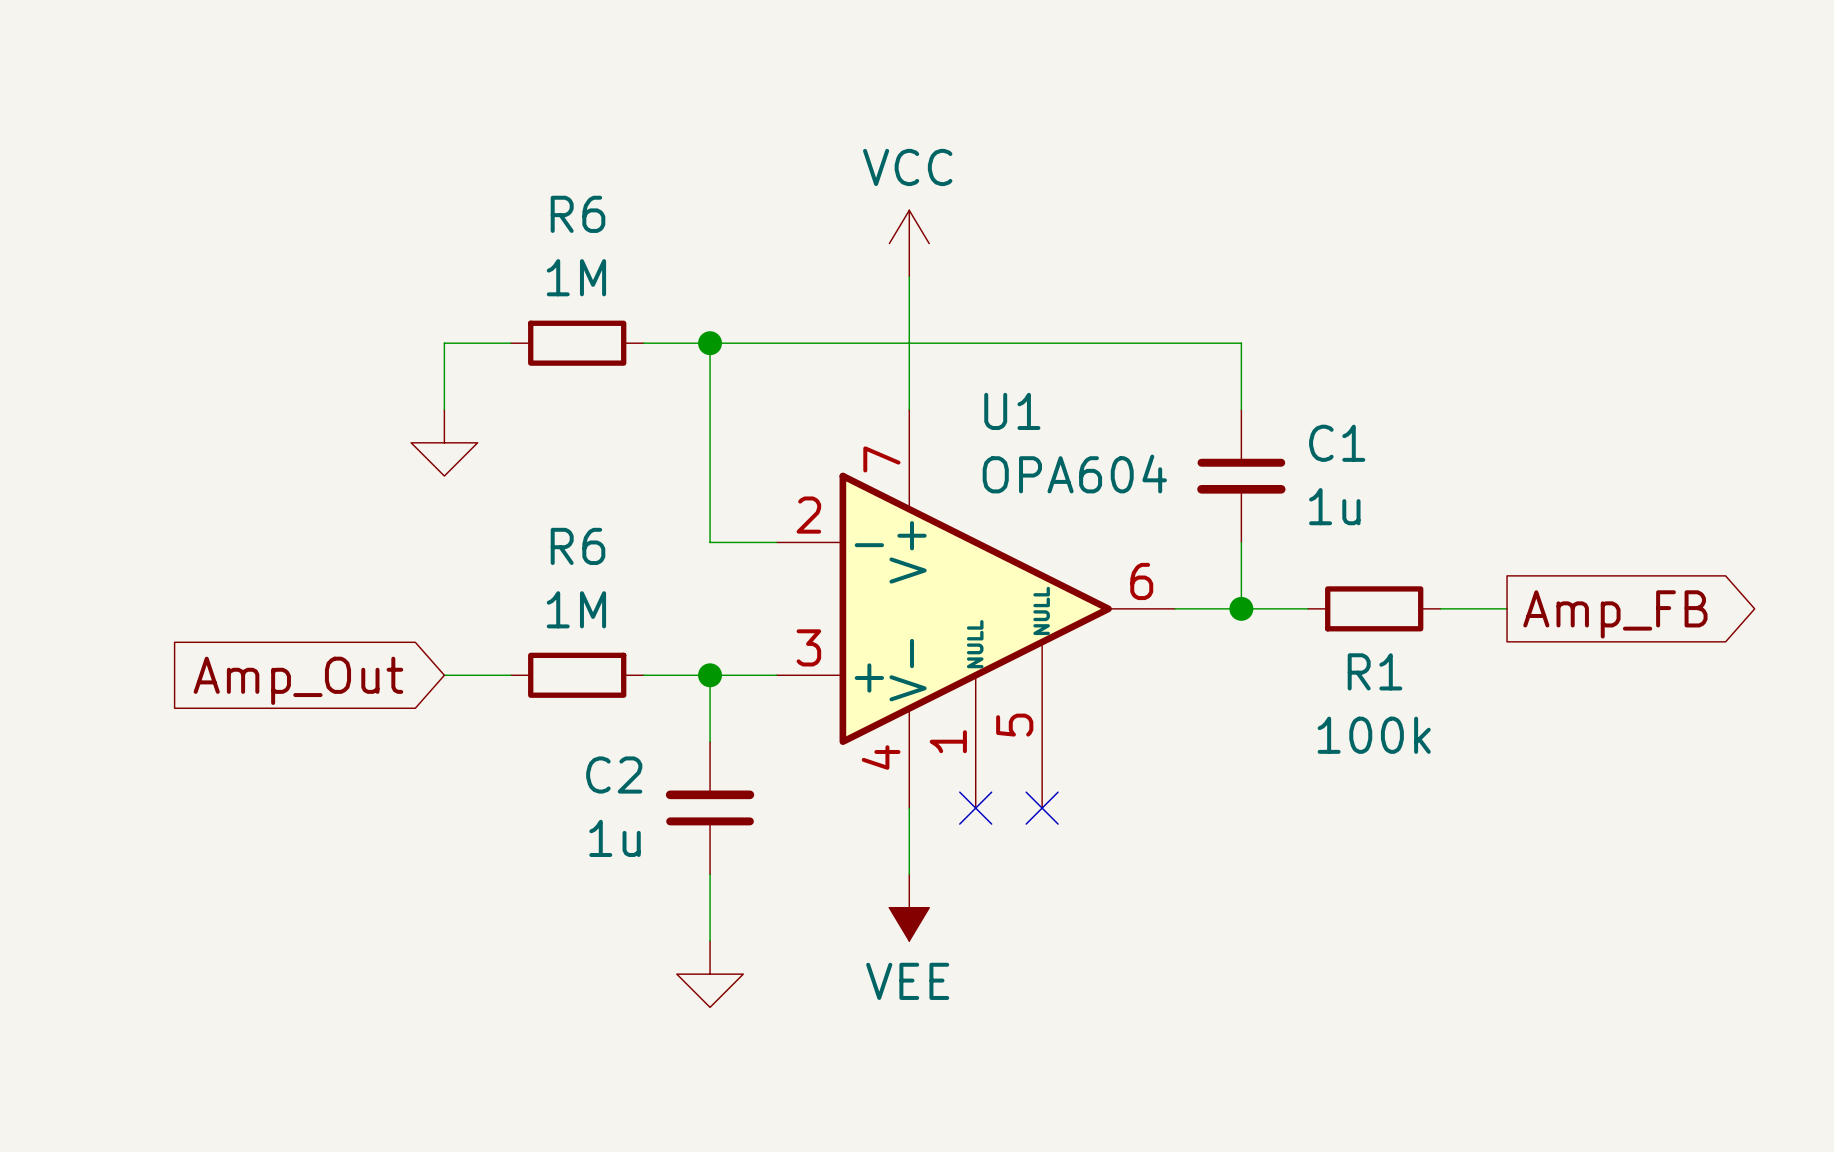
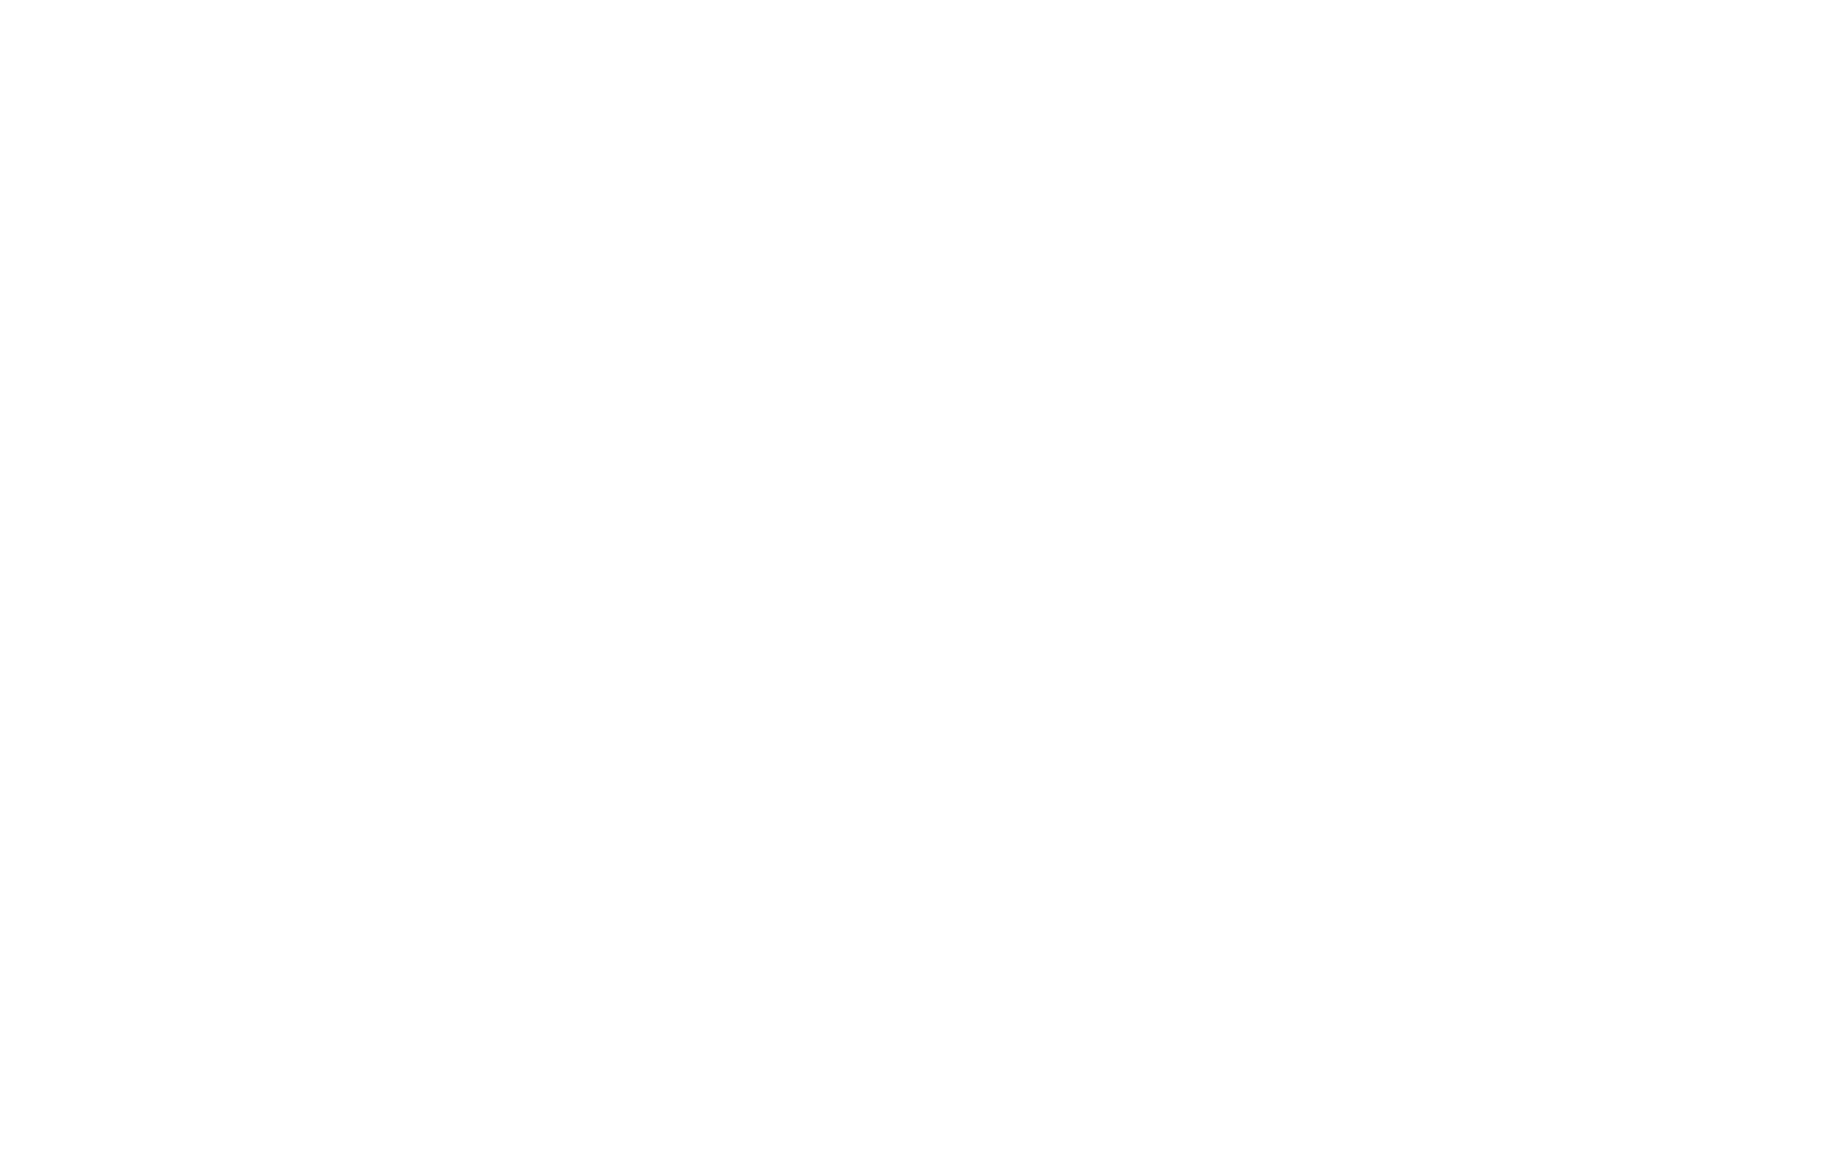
power symbol: VCC (909, 243) -> none
wire: (909, 276) (909, 409) -> none
wire: (510, 343) (444, 343) (444, 409) -> none
R6: 1M (577, 343) -> none
wire: (643, 343) (1241, 343) (1241, 409) -> none
wire: (710, 343) (710, 542) (776, 542) -> none
junction: (710, 343) -> none
power symbol: (444, 442) -> none
C1: 1u (1241, 476) -> none
wire: (1241, 542) (1241, 608) -> none
U1: OPA604 (975, 608) -> none
wire: (1174, 608) (1307, 608) -> none
junction: (1241, 608) -> none
R1: 100k (1374, 608) -> none
wire: (1440, 608) (1507, 608) -> none
global label: Amp_FB (1615, 614) -> none
wire: (444, 675) (510, 675) -> none
R6: 1M (577, 675) -> none
wire: (643, 675) (776, 675) -> none
wire: (710, 675) (710, 741) -> none
junction: (710, 675) -> none
global label: Amp_Out (298, 680) -> none
C2: 1u (710, 808) -> none
wire: (909, 808) (909, 874) -> none
no-connect mark: (975, 808) -> none
no-connect mark: (1042, 808) -> none
wire: (710, 874) (710, 940) -> none
power symbol: VEE (909, 907) -> none
power symbol: (710, 974) -> none

